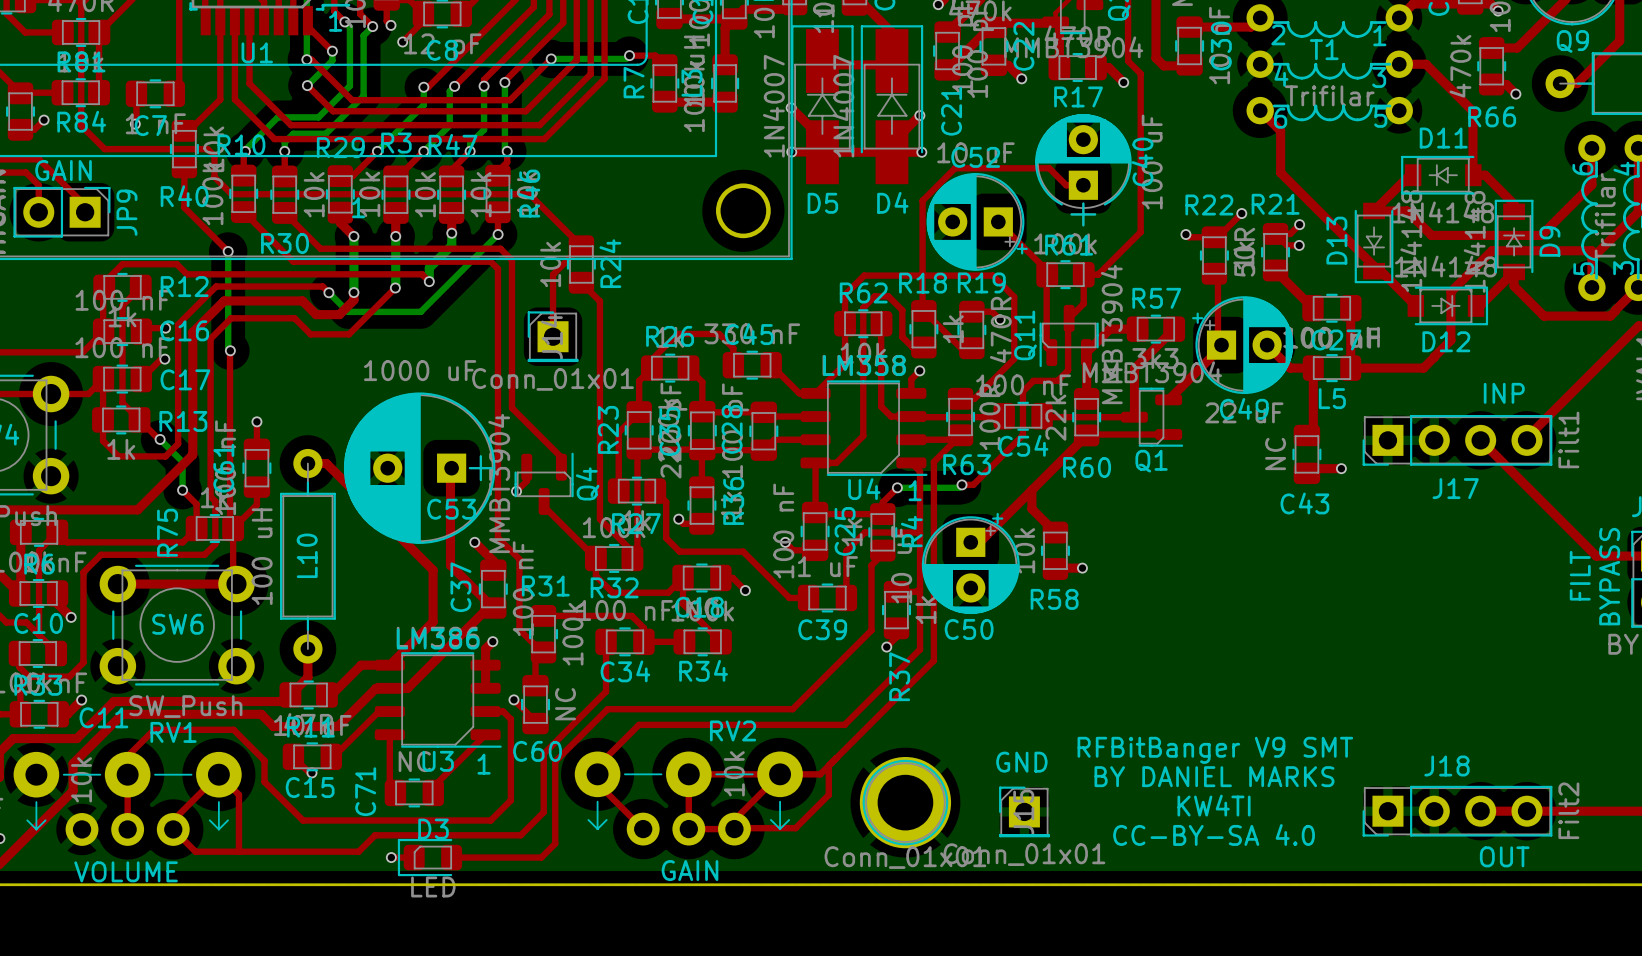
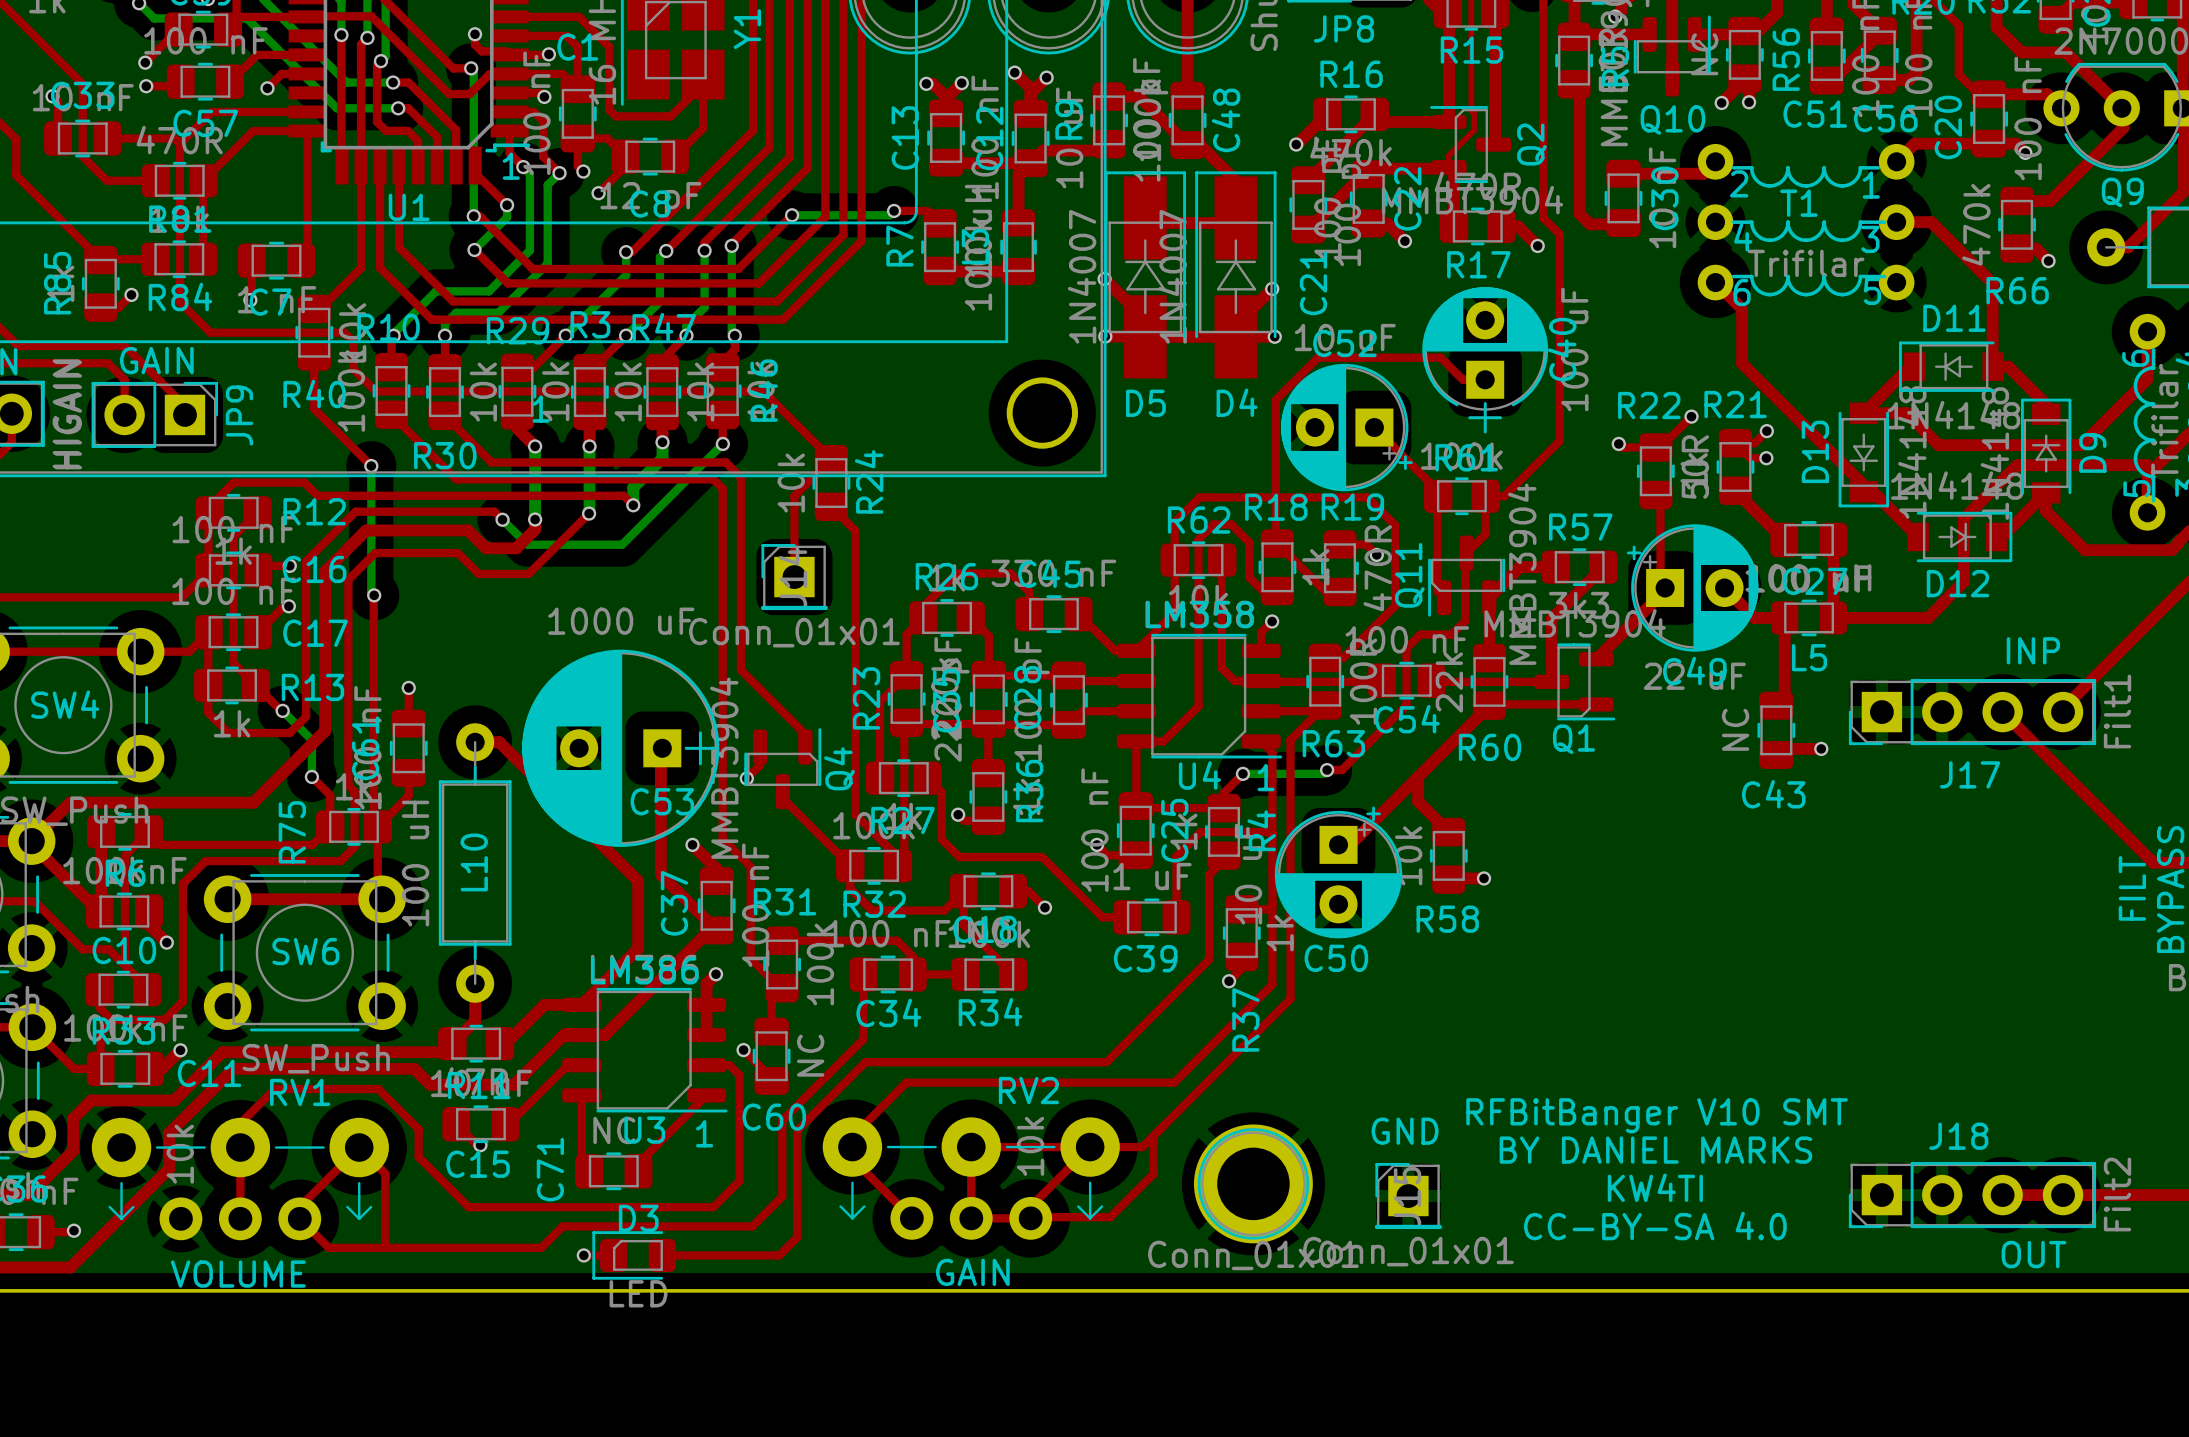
text: RFBitBanger V9 SMT (1215, 750) -> RFBitBanger V10 SMT (1657, 1115)

